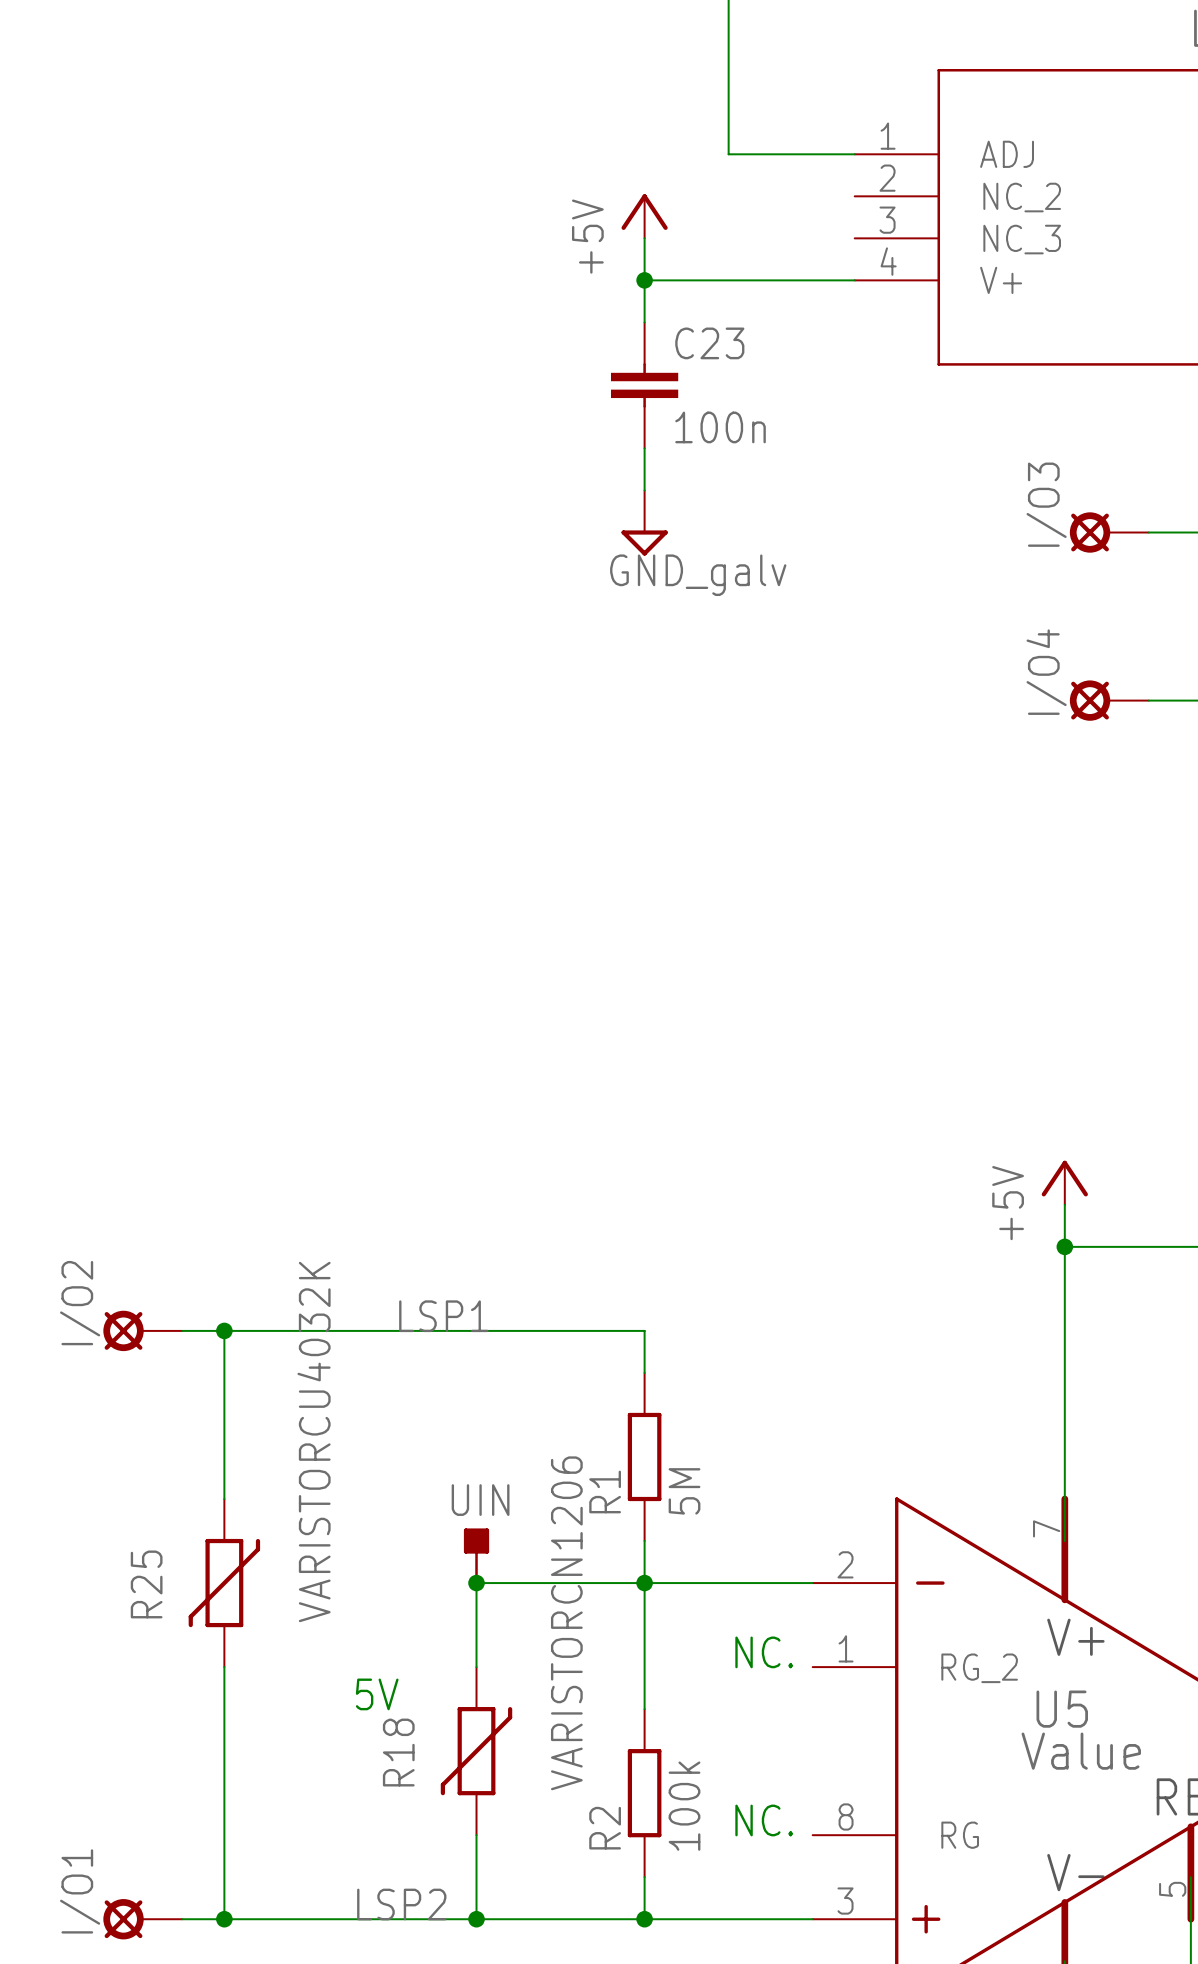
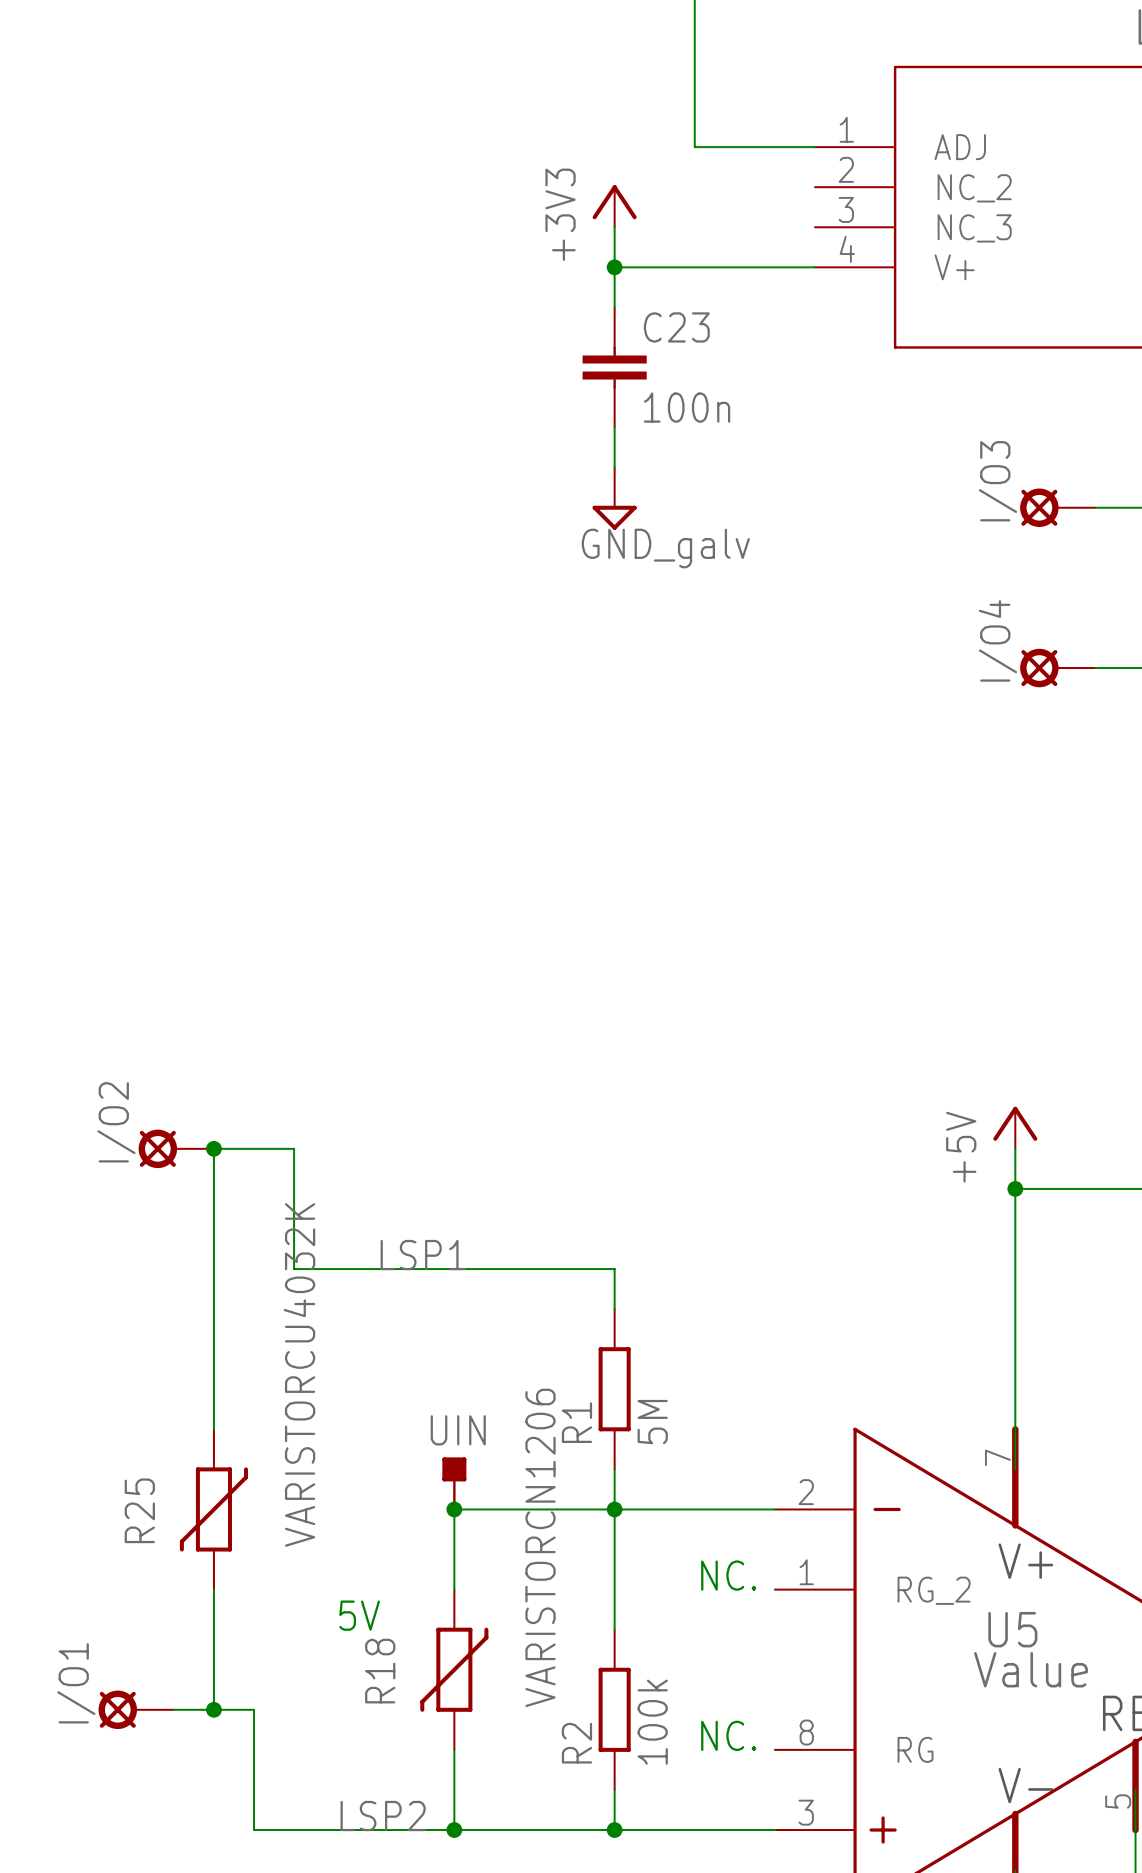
power symbol: +5V (644, 216) -> +3V3 (614, 206)
junction: none -> (213, 1148)
I/O2 position: (142, 1330) -> (176, 1148)
wire: (182, 1330) (308, 1330) -> (213, 1269) (213, 1148) (294, 1148) (294, 1269)
junction: (224, 1330) -> none
wire: (224, 1793) (224, 1919) -> none
junction: none -> (213, 1709)
I/O1 position: (142, 1919) -> (136, 1709)
wire: (182, 1919) (266, 1919) -> (173, 1709) (254, 1709) (254, 1830)
junction: (224, 1919) -> none

